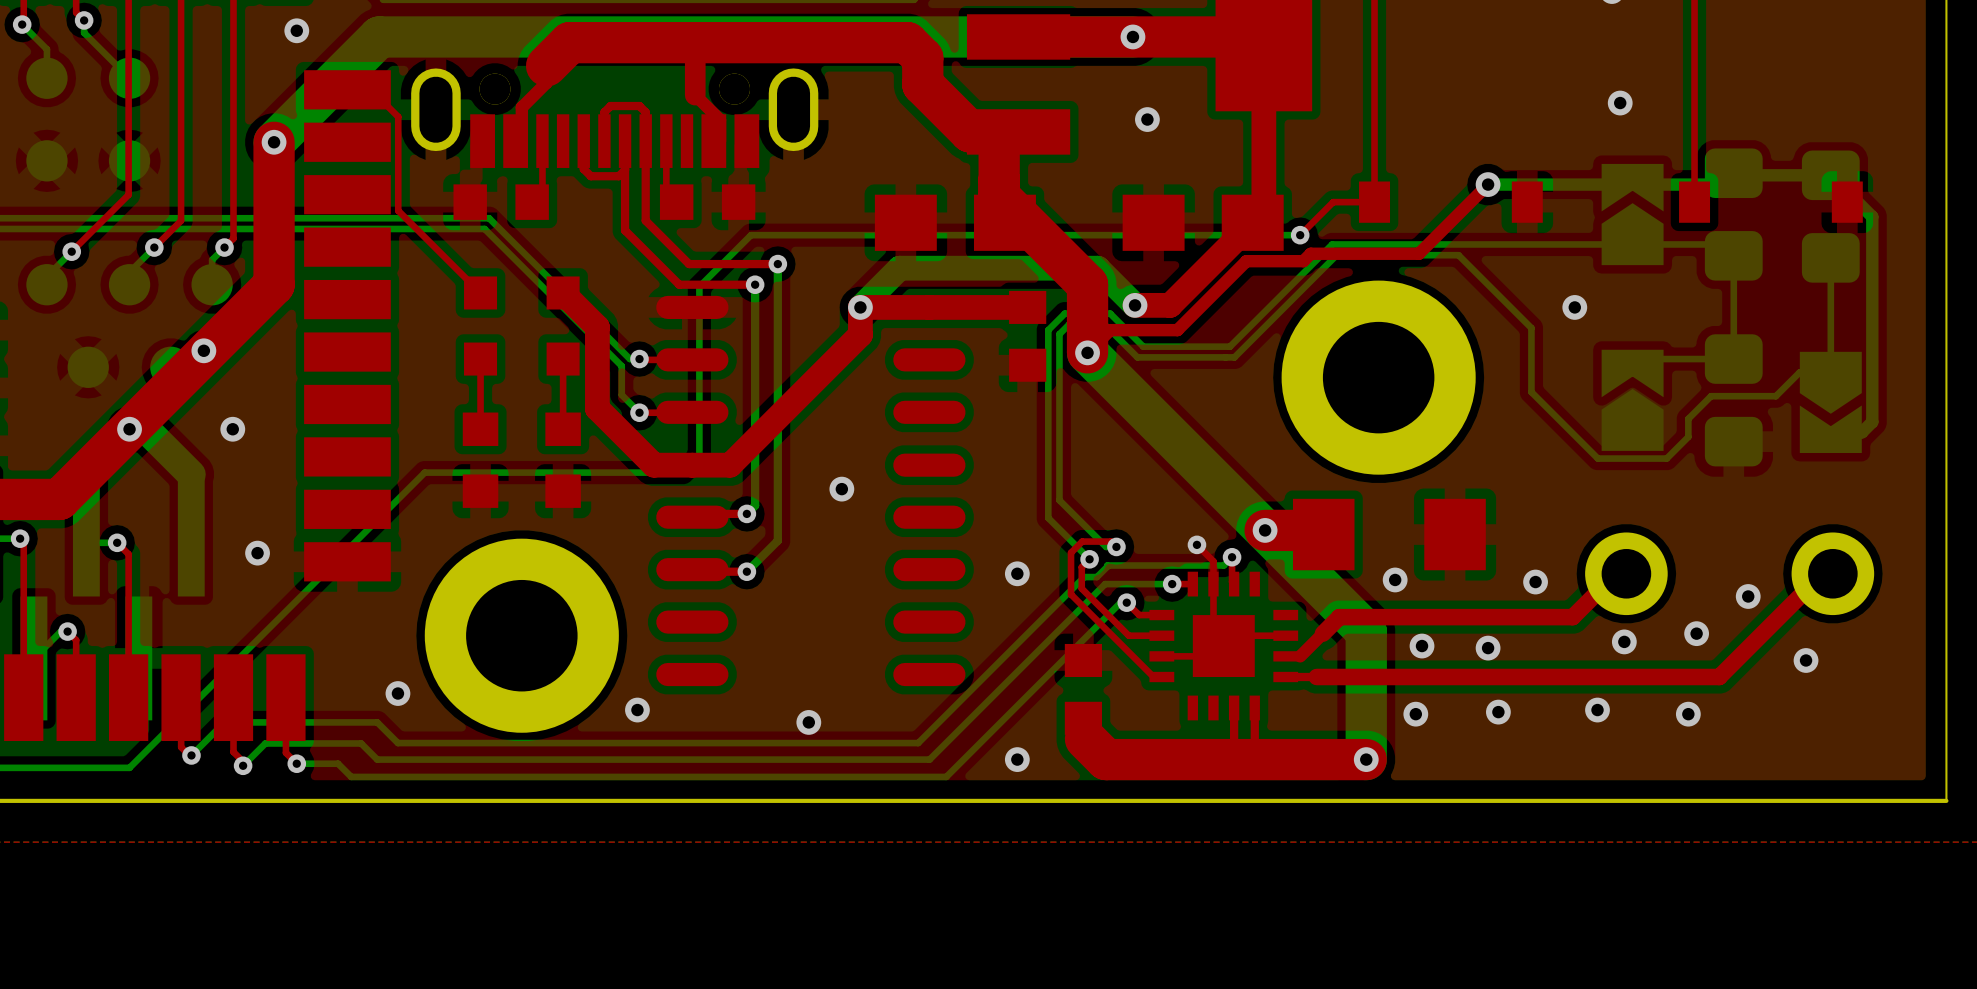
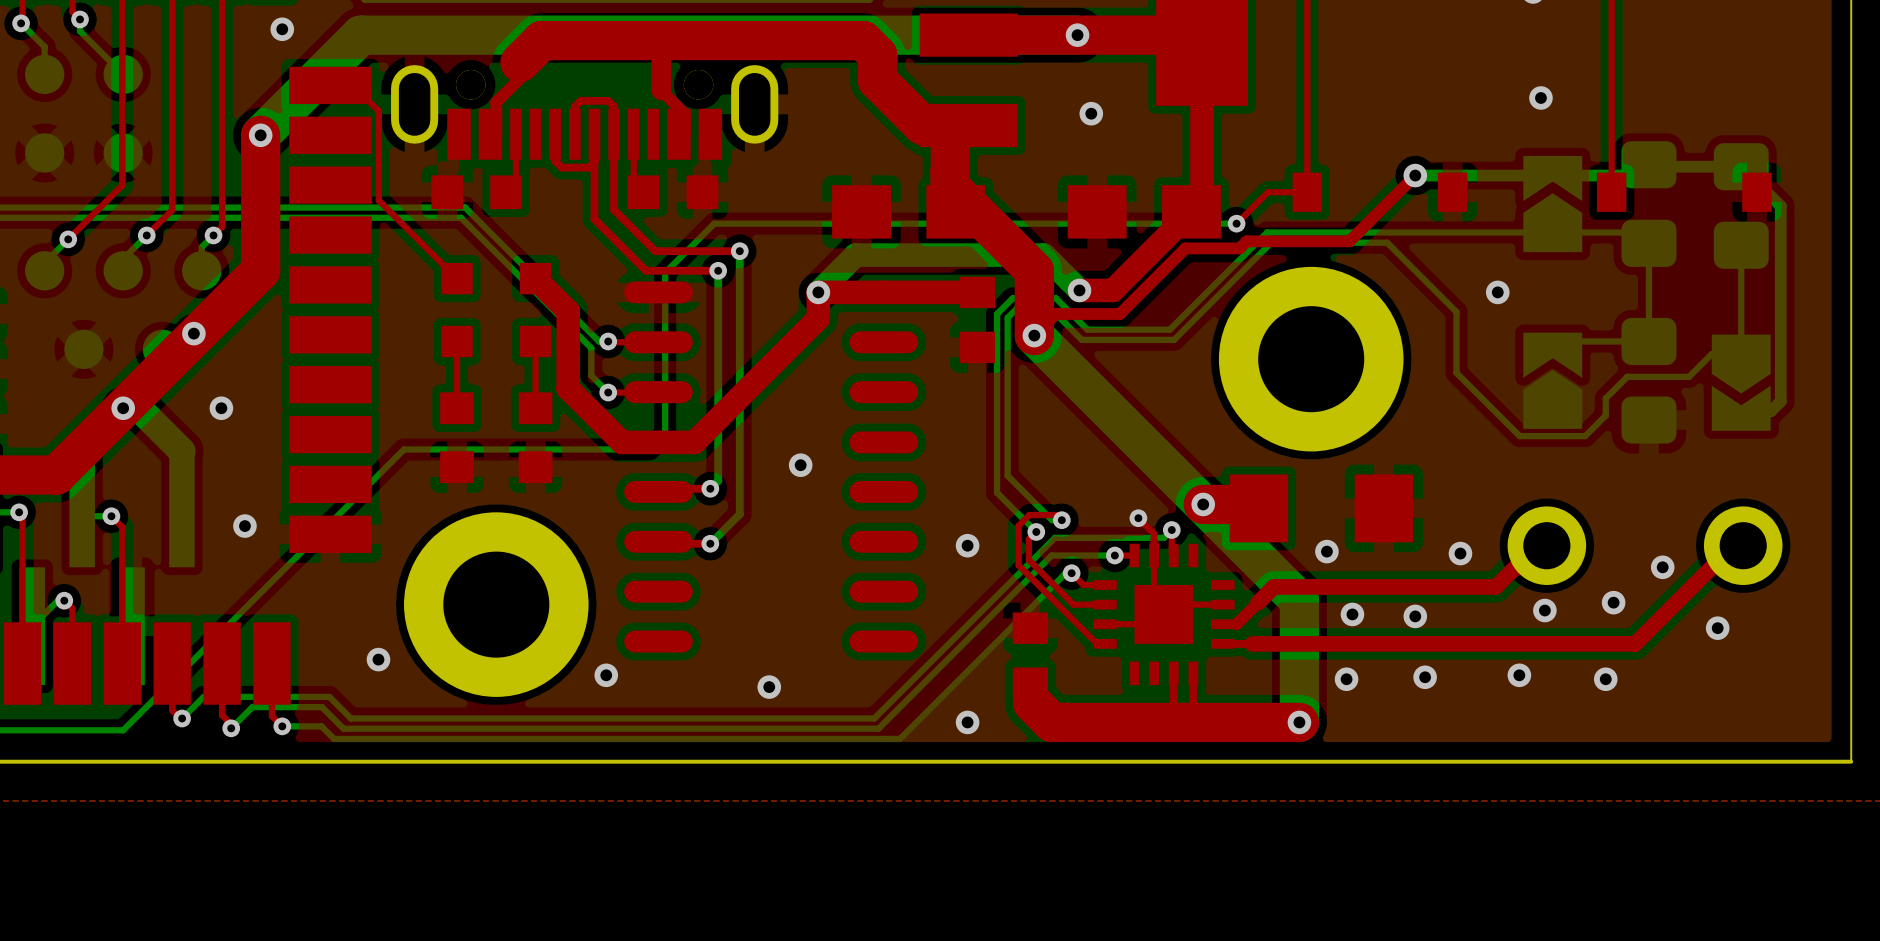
bottom track: (1109, 565) (1096, 577) (1084, 577) (918, 743) (397, 743) (377, 722) (224, 722) (214, 732) -> (1054, 537) (874, 718) (350, 718) (329, 696) (203, 696)
bottom track: (1105, 584) (929, 759) (377, 759) (361, 743) (338, 743) -> (1051, 555) (878, 728) (343, 728) (321, 707)

